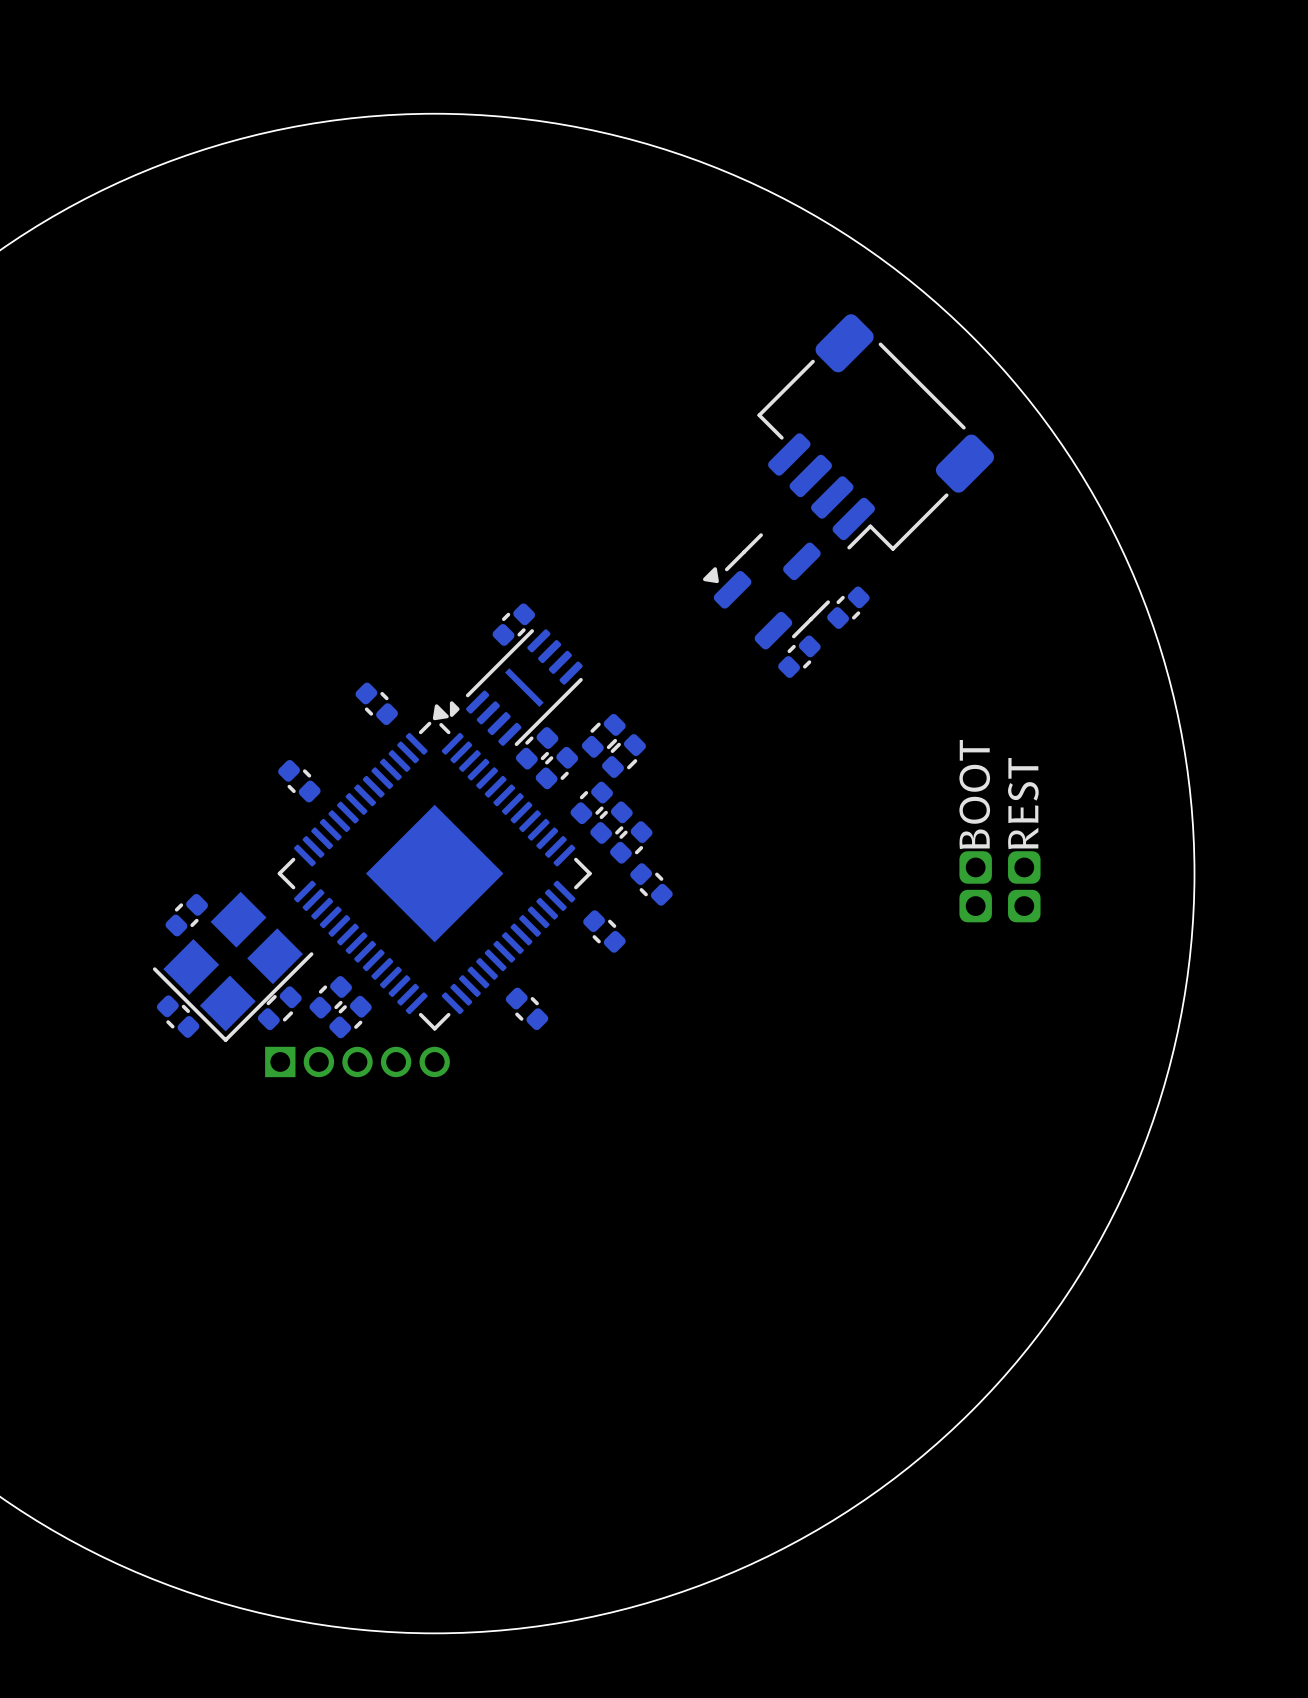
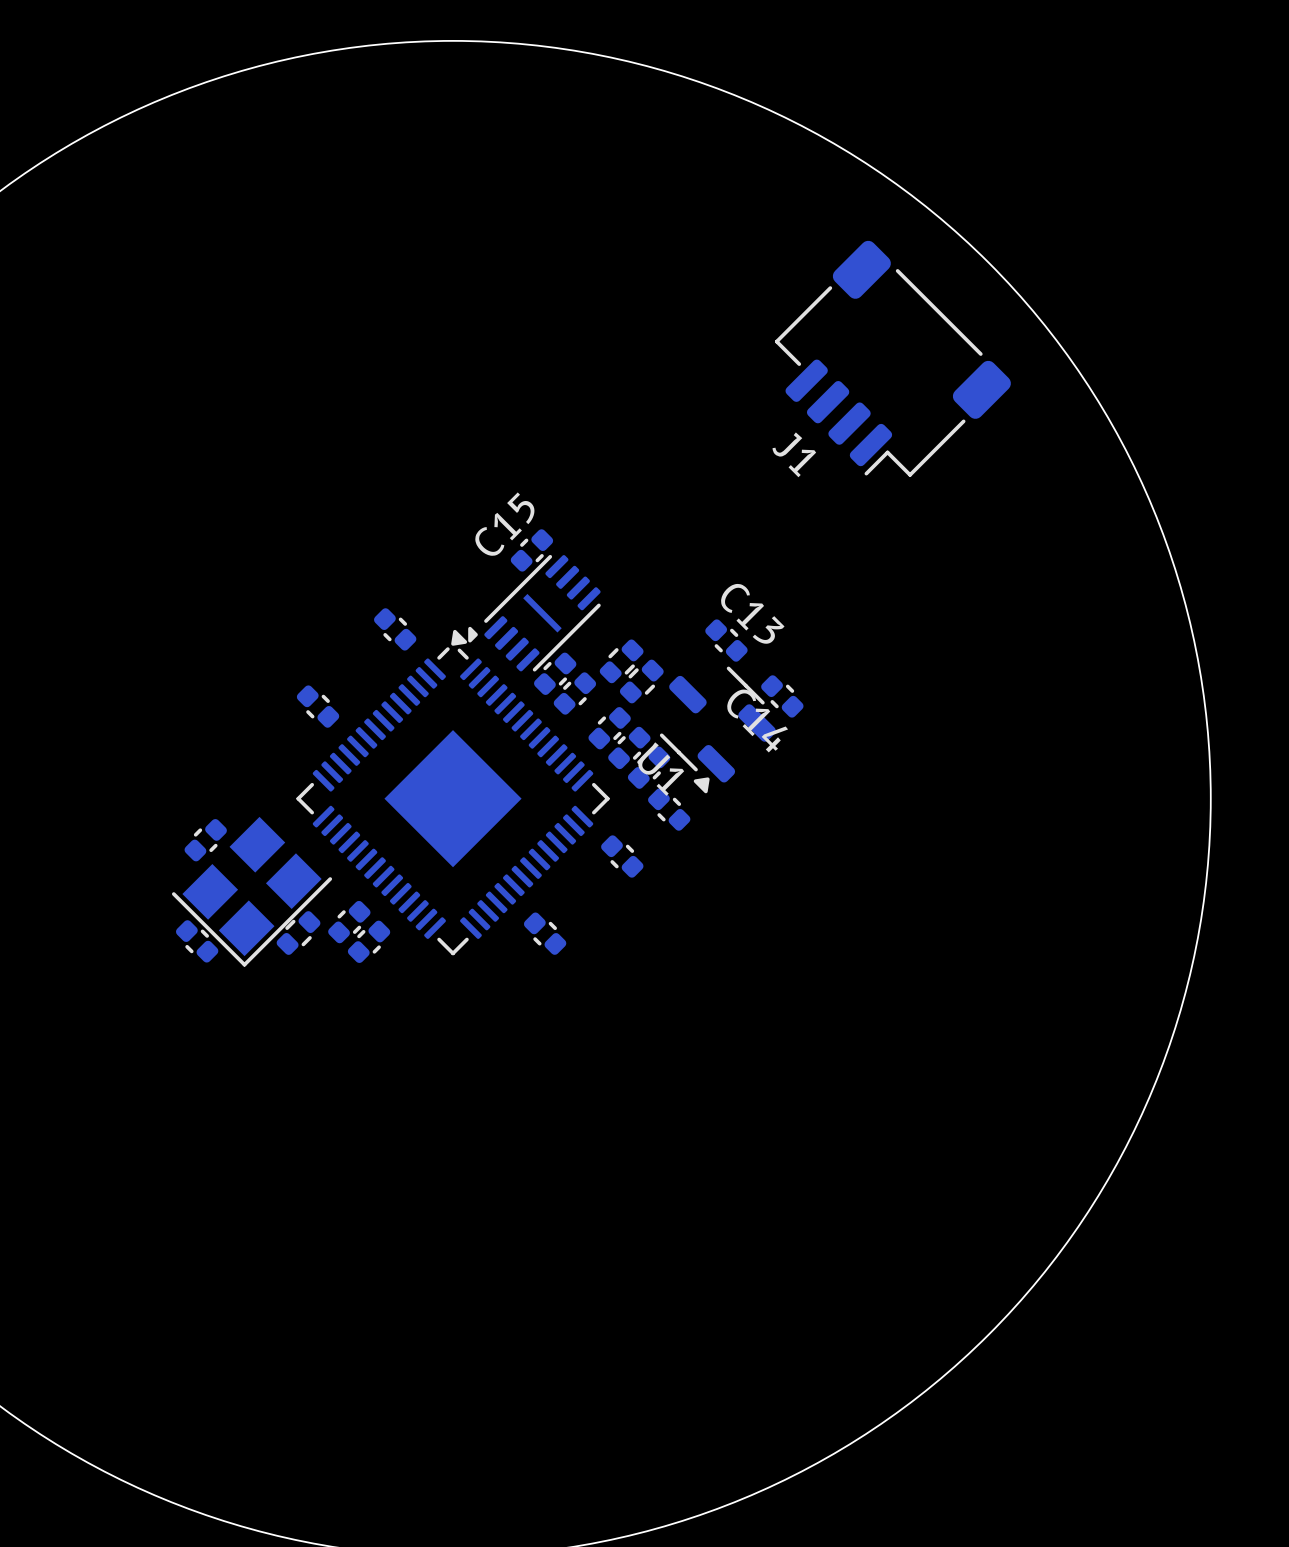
J1 name: none -> J1 (794, 454)
part: (766, 591) -> none
C15 name: none -> C15 (504, 524)
part: (848, 607) -> none
part: (799, 656) -> none
C13: none -> (726, 640)
C14: none -> (782, 696)
U1: none -> (717, 729)
part: (975, 886) -> none
part: (1024, 886) -> none
part: (357, 1061) -> none

